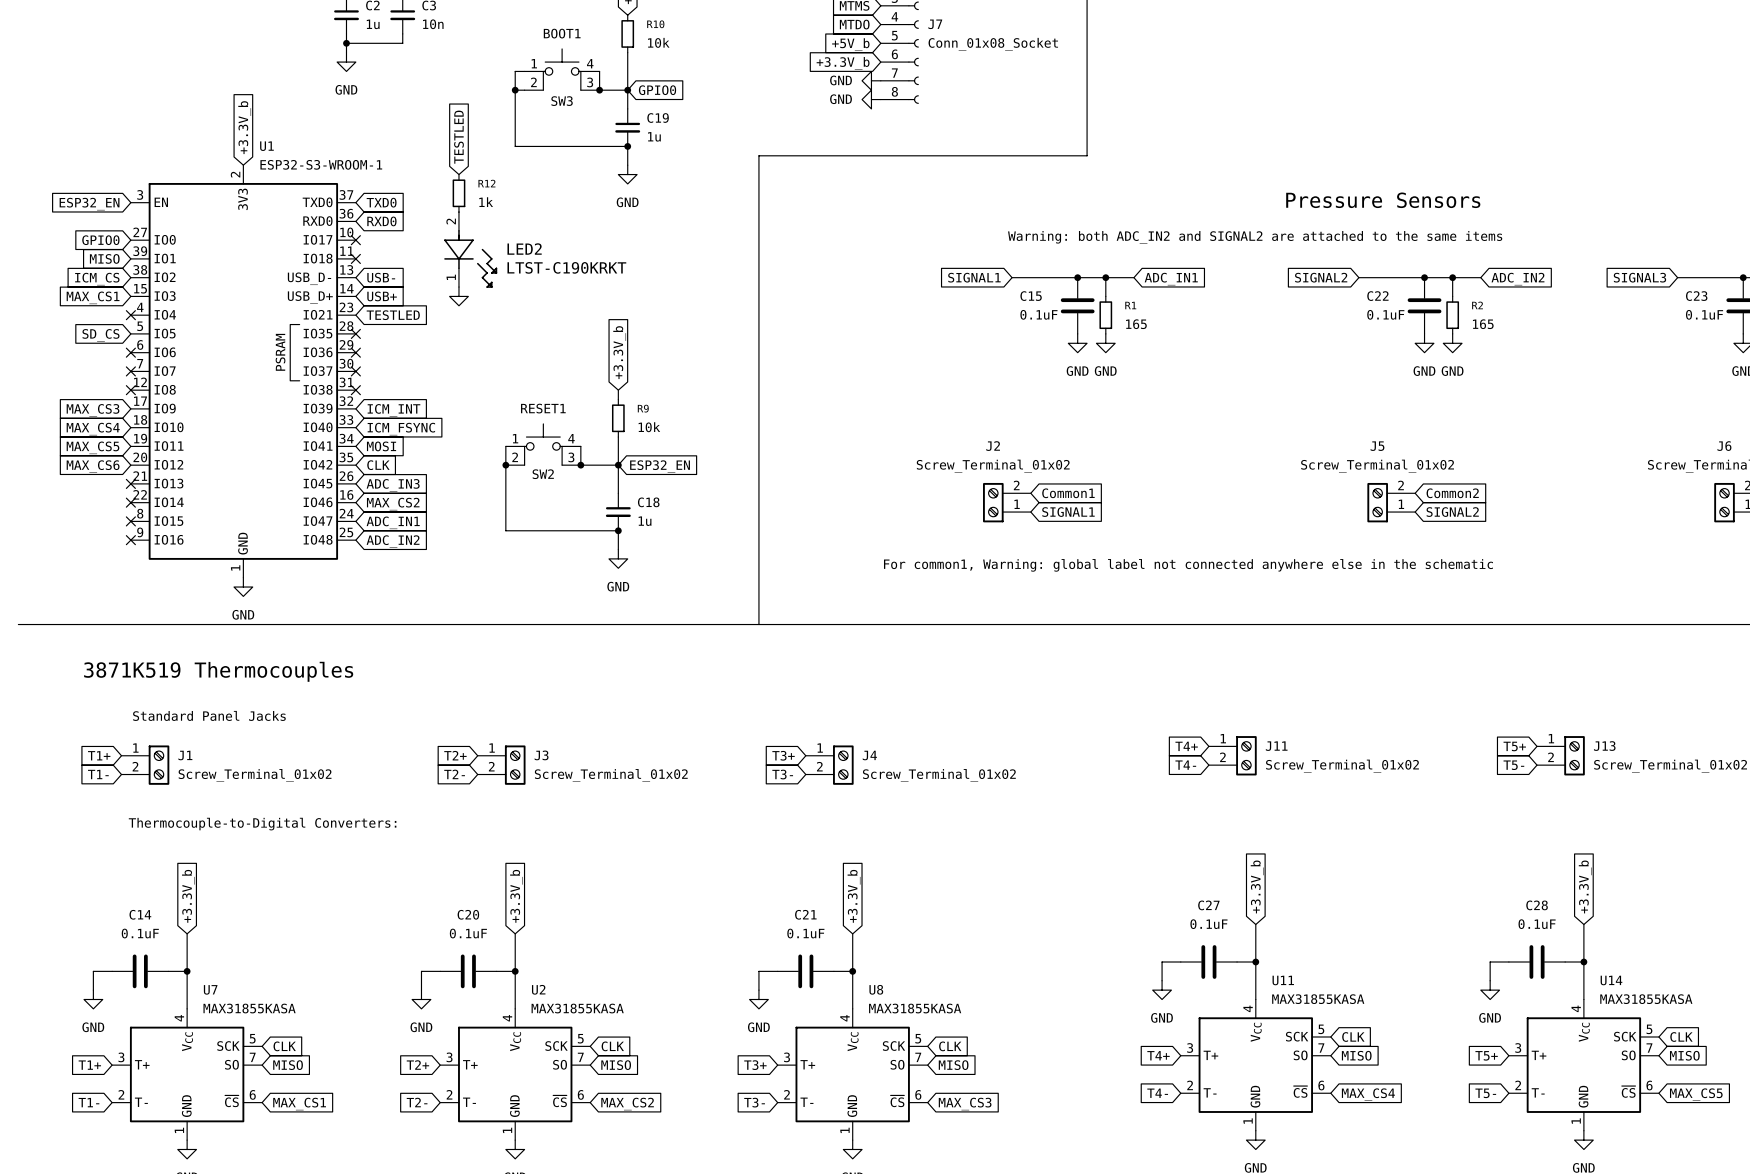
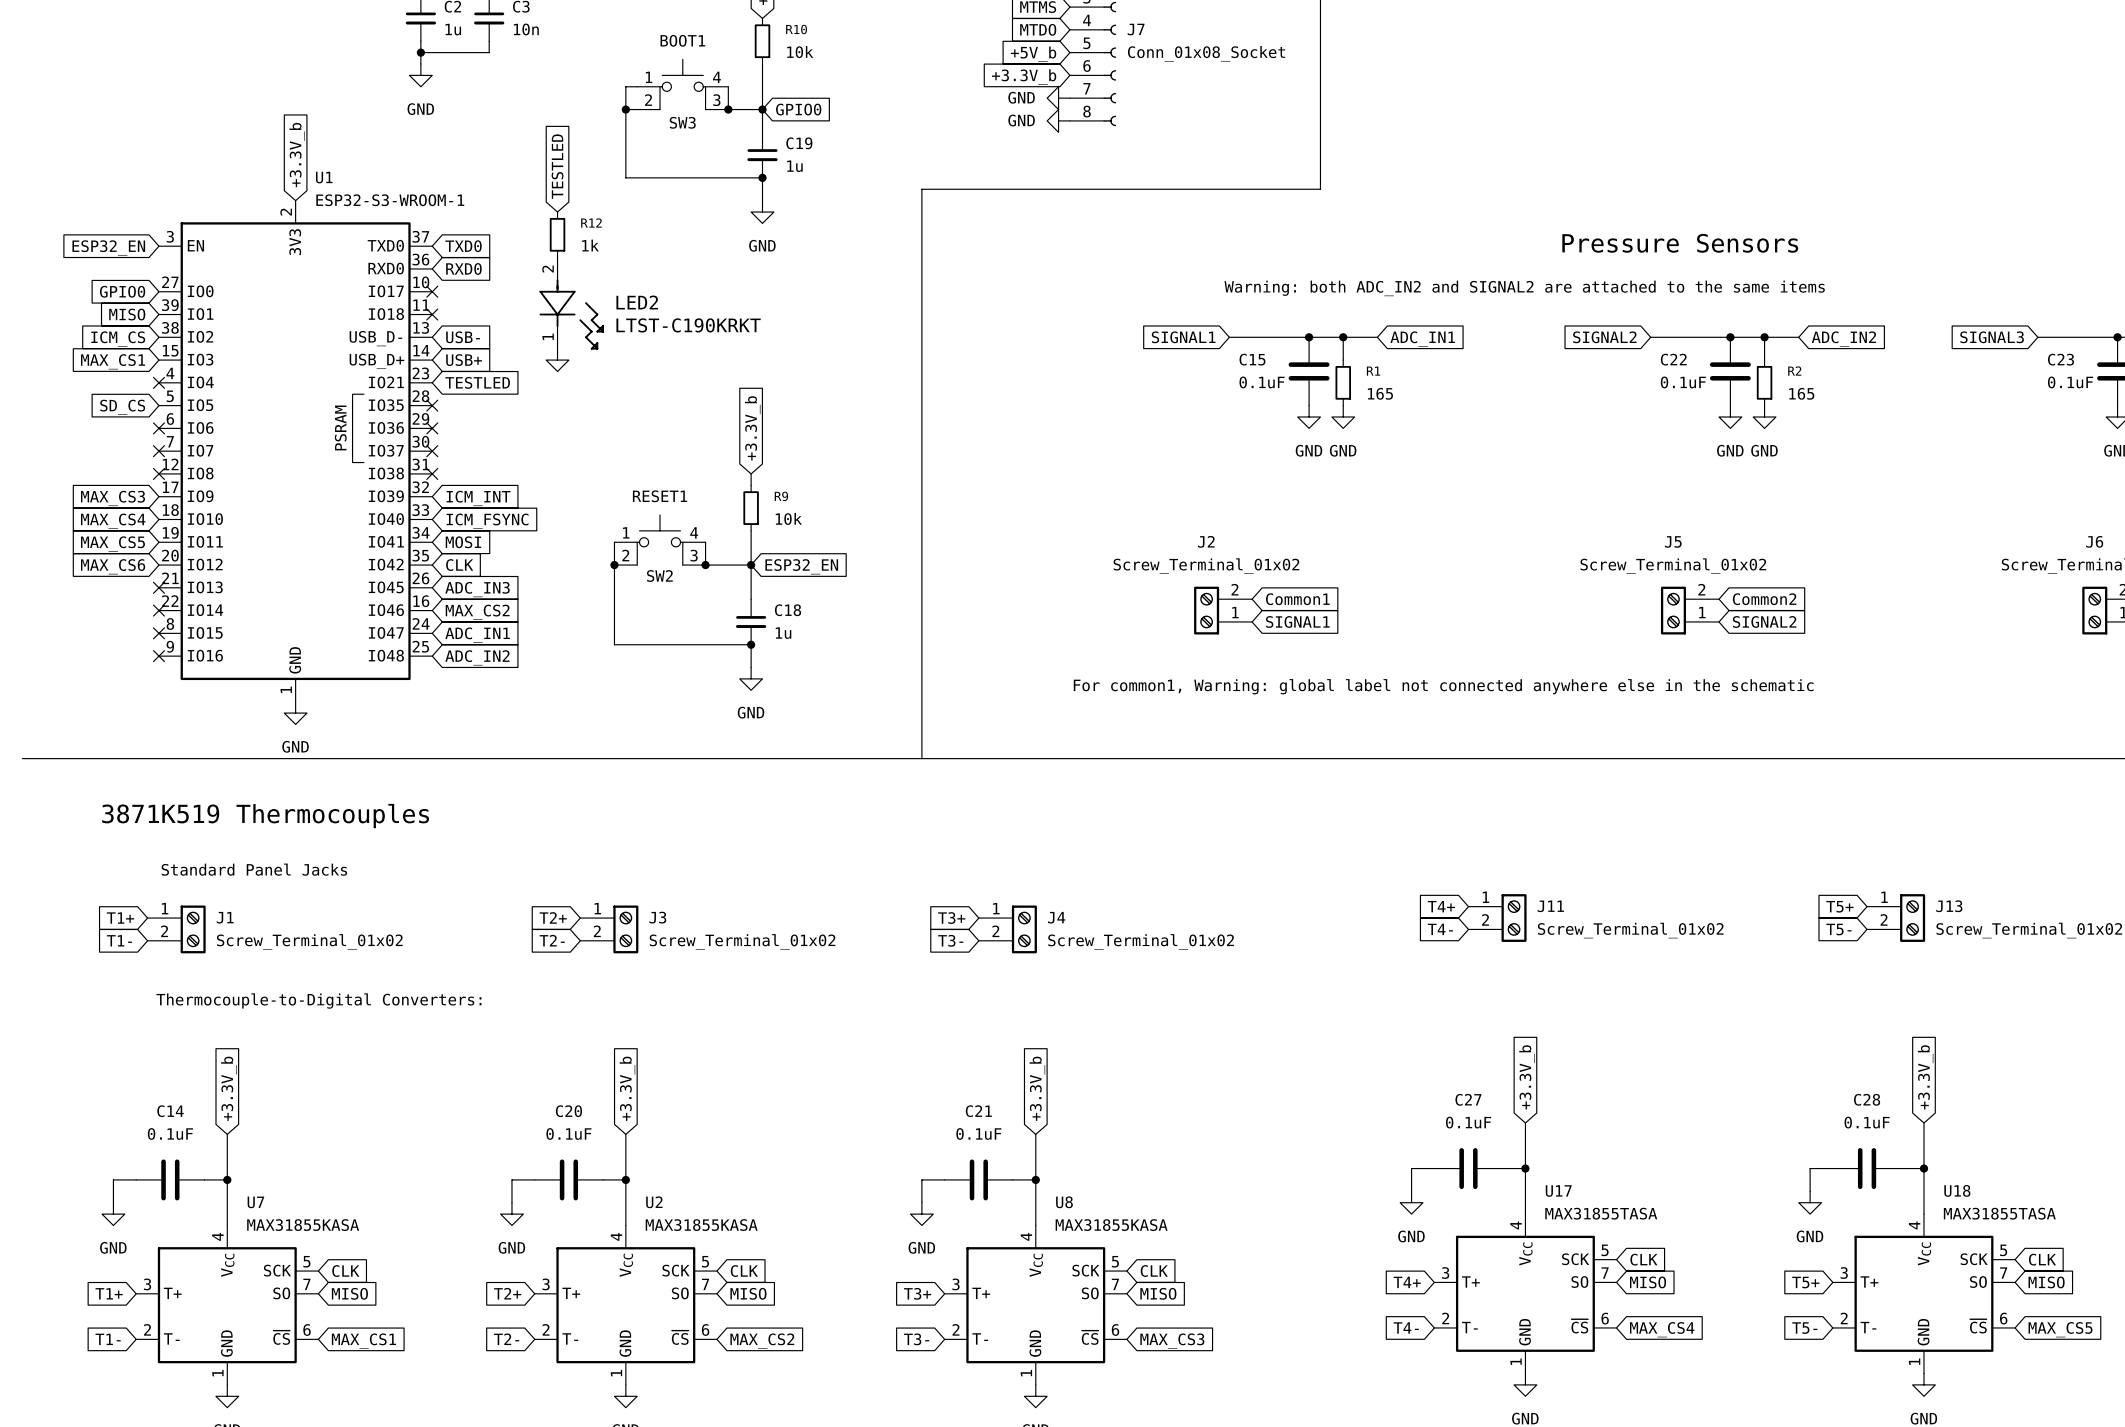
U11 name: U11 (1283, 980) -> U17 (1558, 1191)
U14 name: U14 (1611, 980) -> U18 (1957, 1190)
U11 value: MAX31855KASA (1318, 999) -> MAX31855TASA (1601, 1213)
U14 value: MAX31855KASA (1646, 999) -> MAX31855TASA (1999, 1213)

